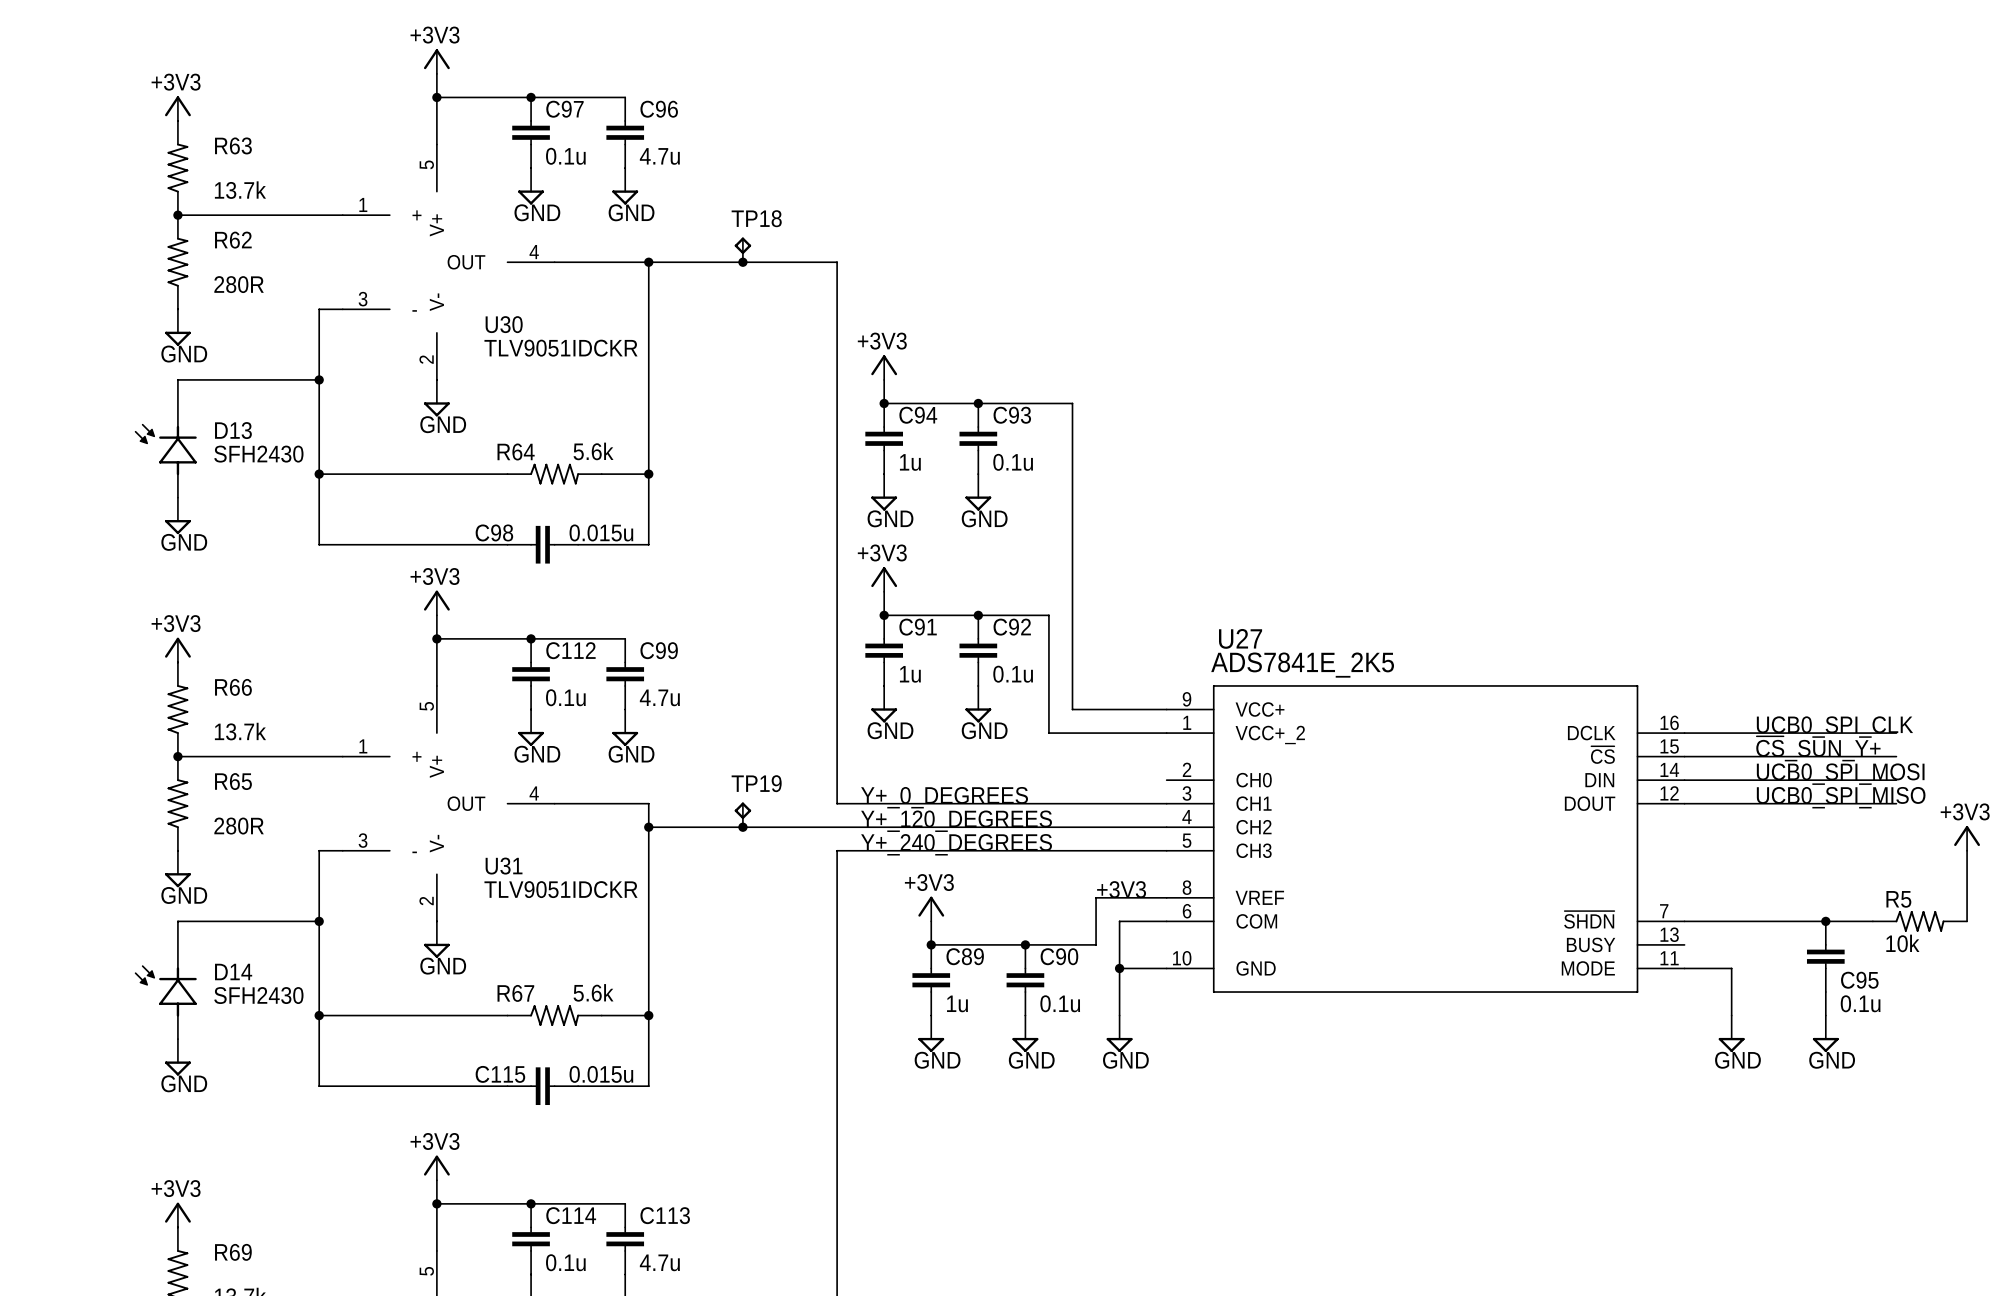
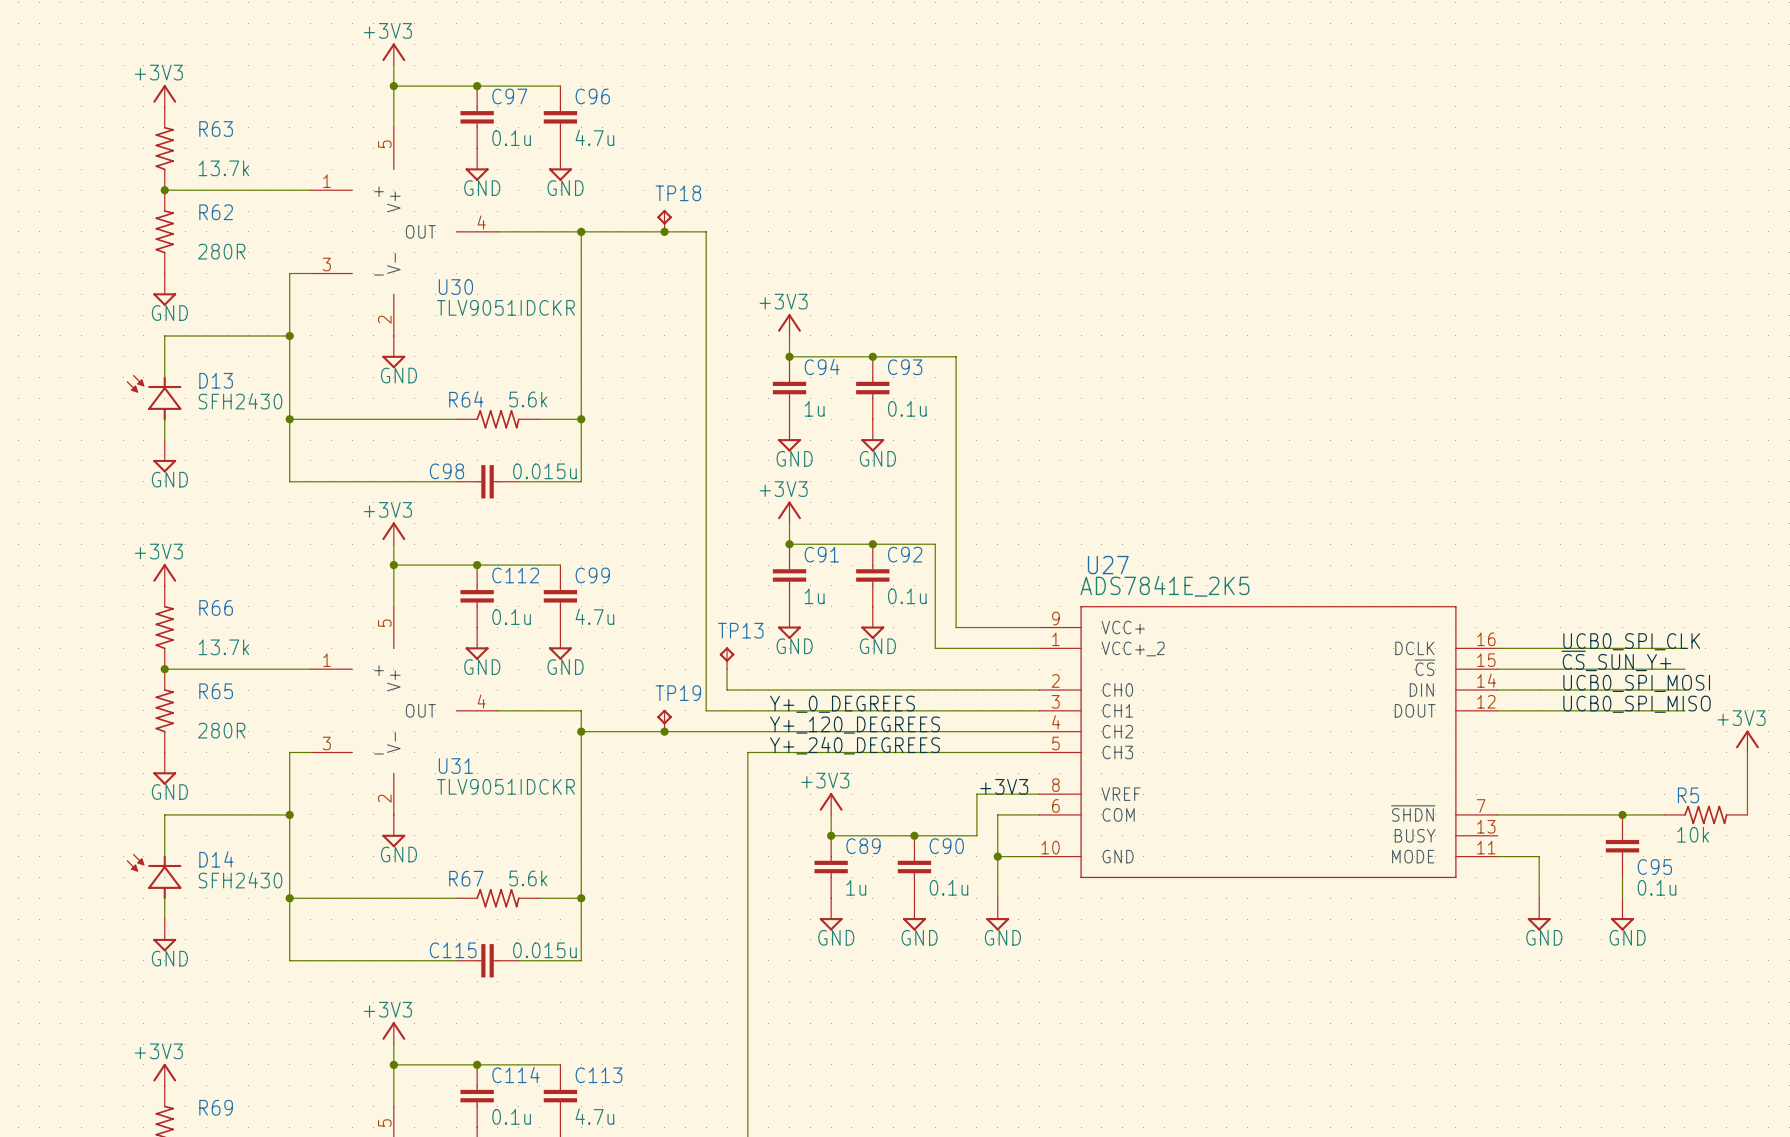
wire: (790, 262) (837, 262) (837, 803) -> (706, 231) (706, 710) (747, 710)
TP13: none -> (727, 658)
wire: none -> (727, 669) (727, 690) (1039, 690)

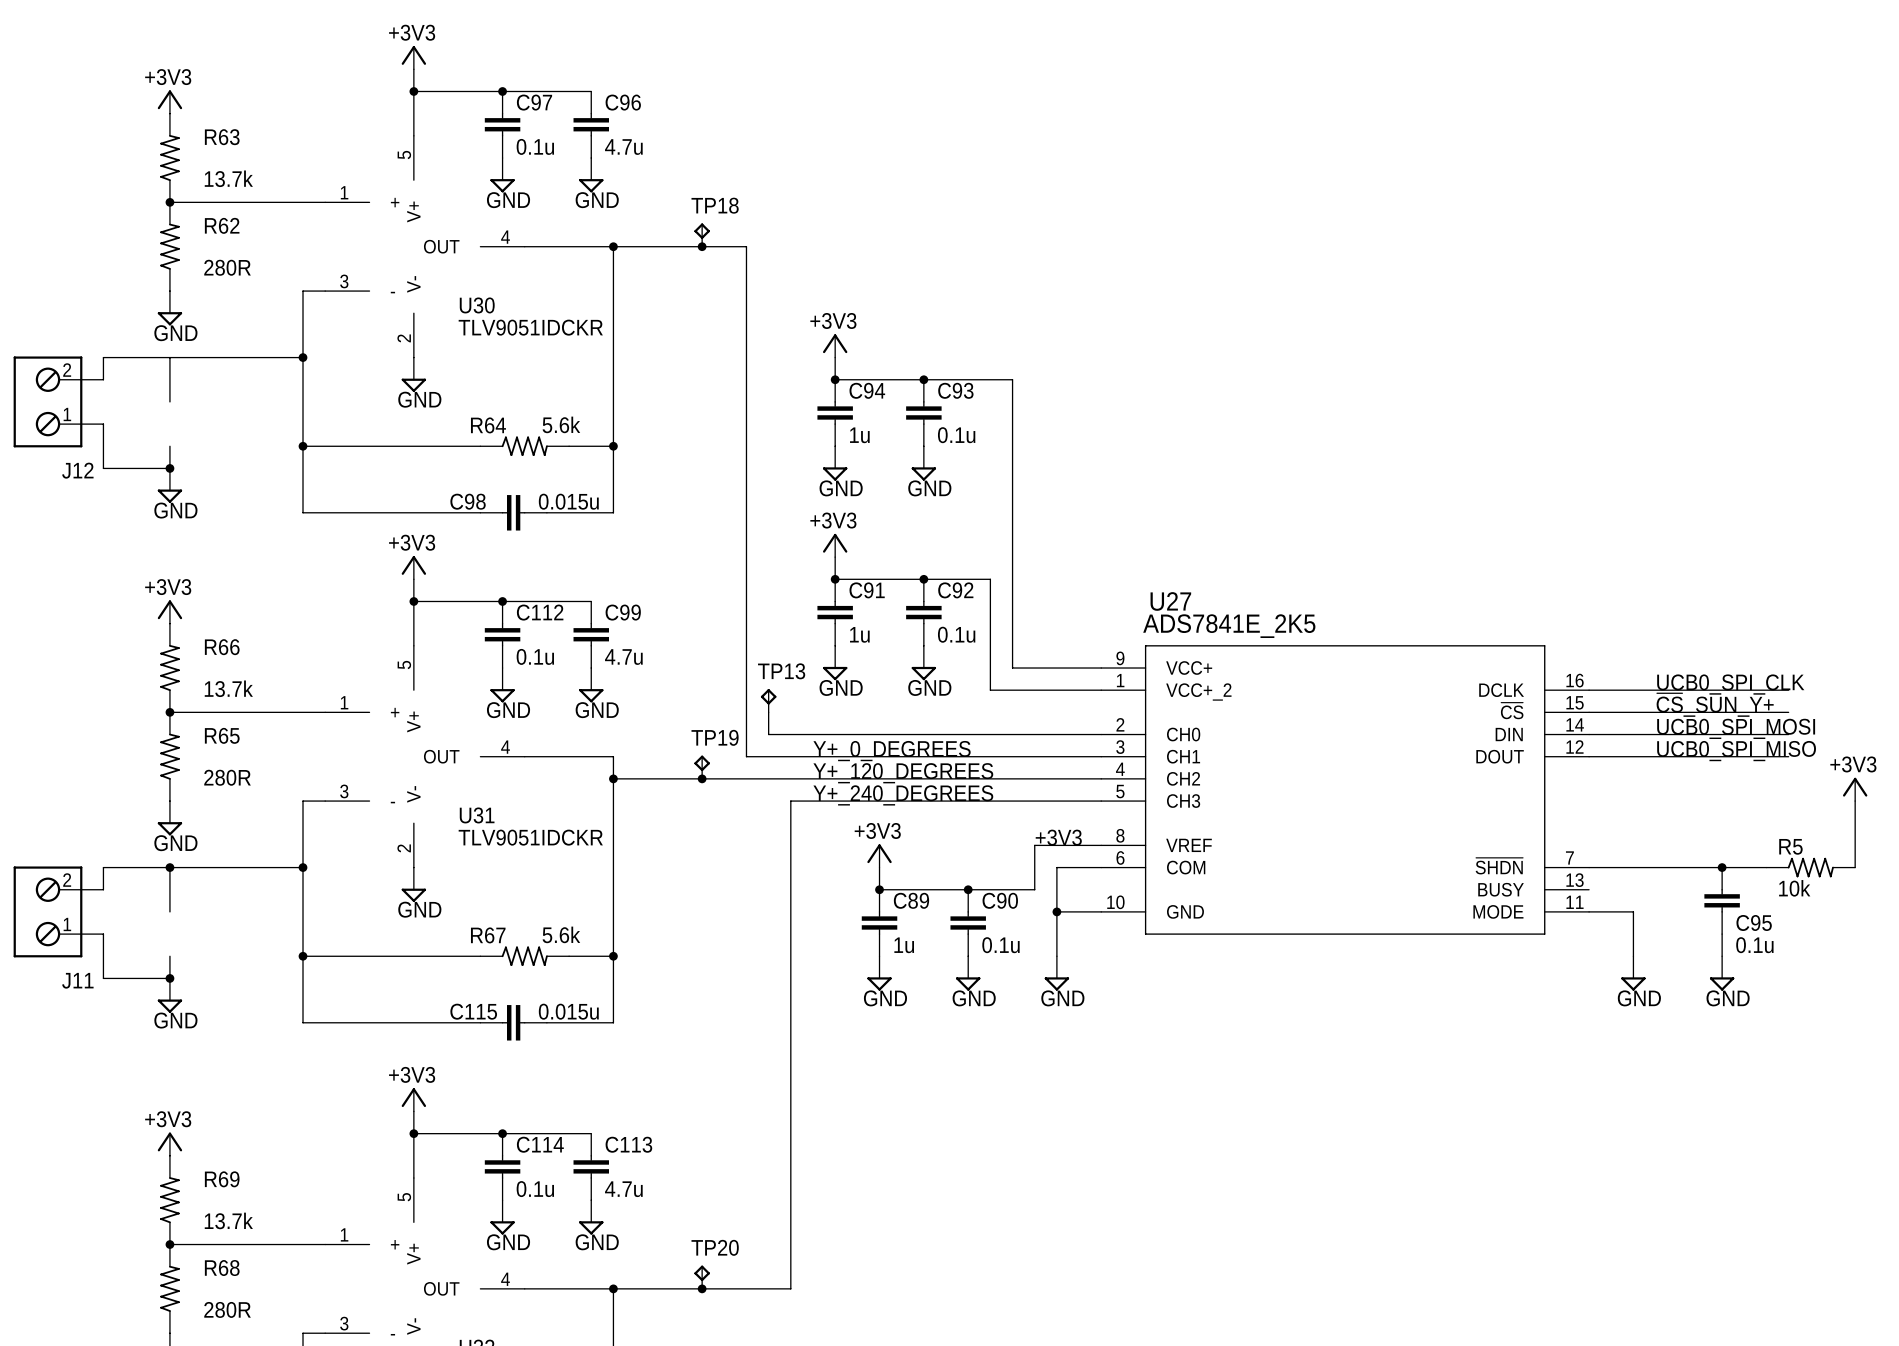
wire: none -> (169, 357) (103, 357) (103, 379) (81, 379)
J12: none -> (48, 401)
D13: SFH2430 (154, 397) -> none
wire: none -> (81, 424) (103, 424) (103, 468) (169, 468)
junction: none -> (169, 468)
wire: none -> (169, 867) (103, 867) (103, 889) (81, 889)
junction: none -> (169, 867)
J11: none -> (48, 911)
D14: SFH2430 (154, 876) -> none
wire: none -> (81, 934) (103, 934) (103, 978) (169, 978)
junction: none -> (169, 978)

